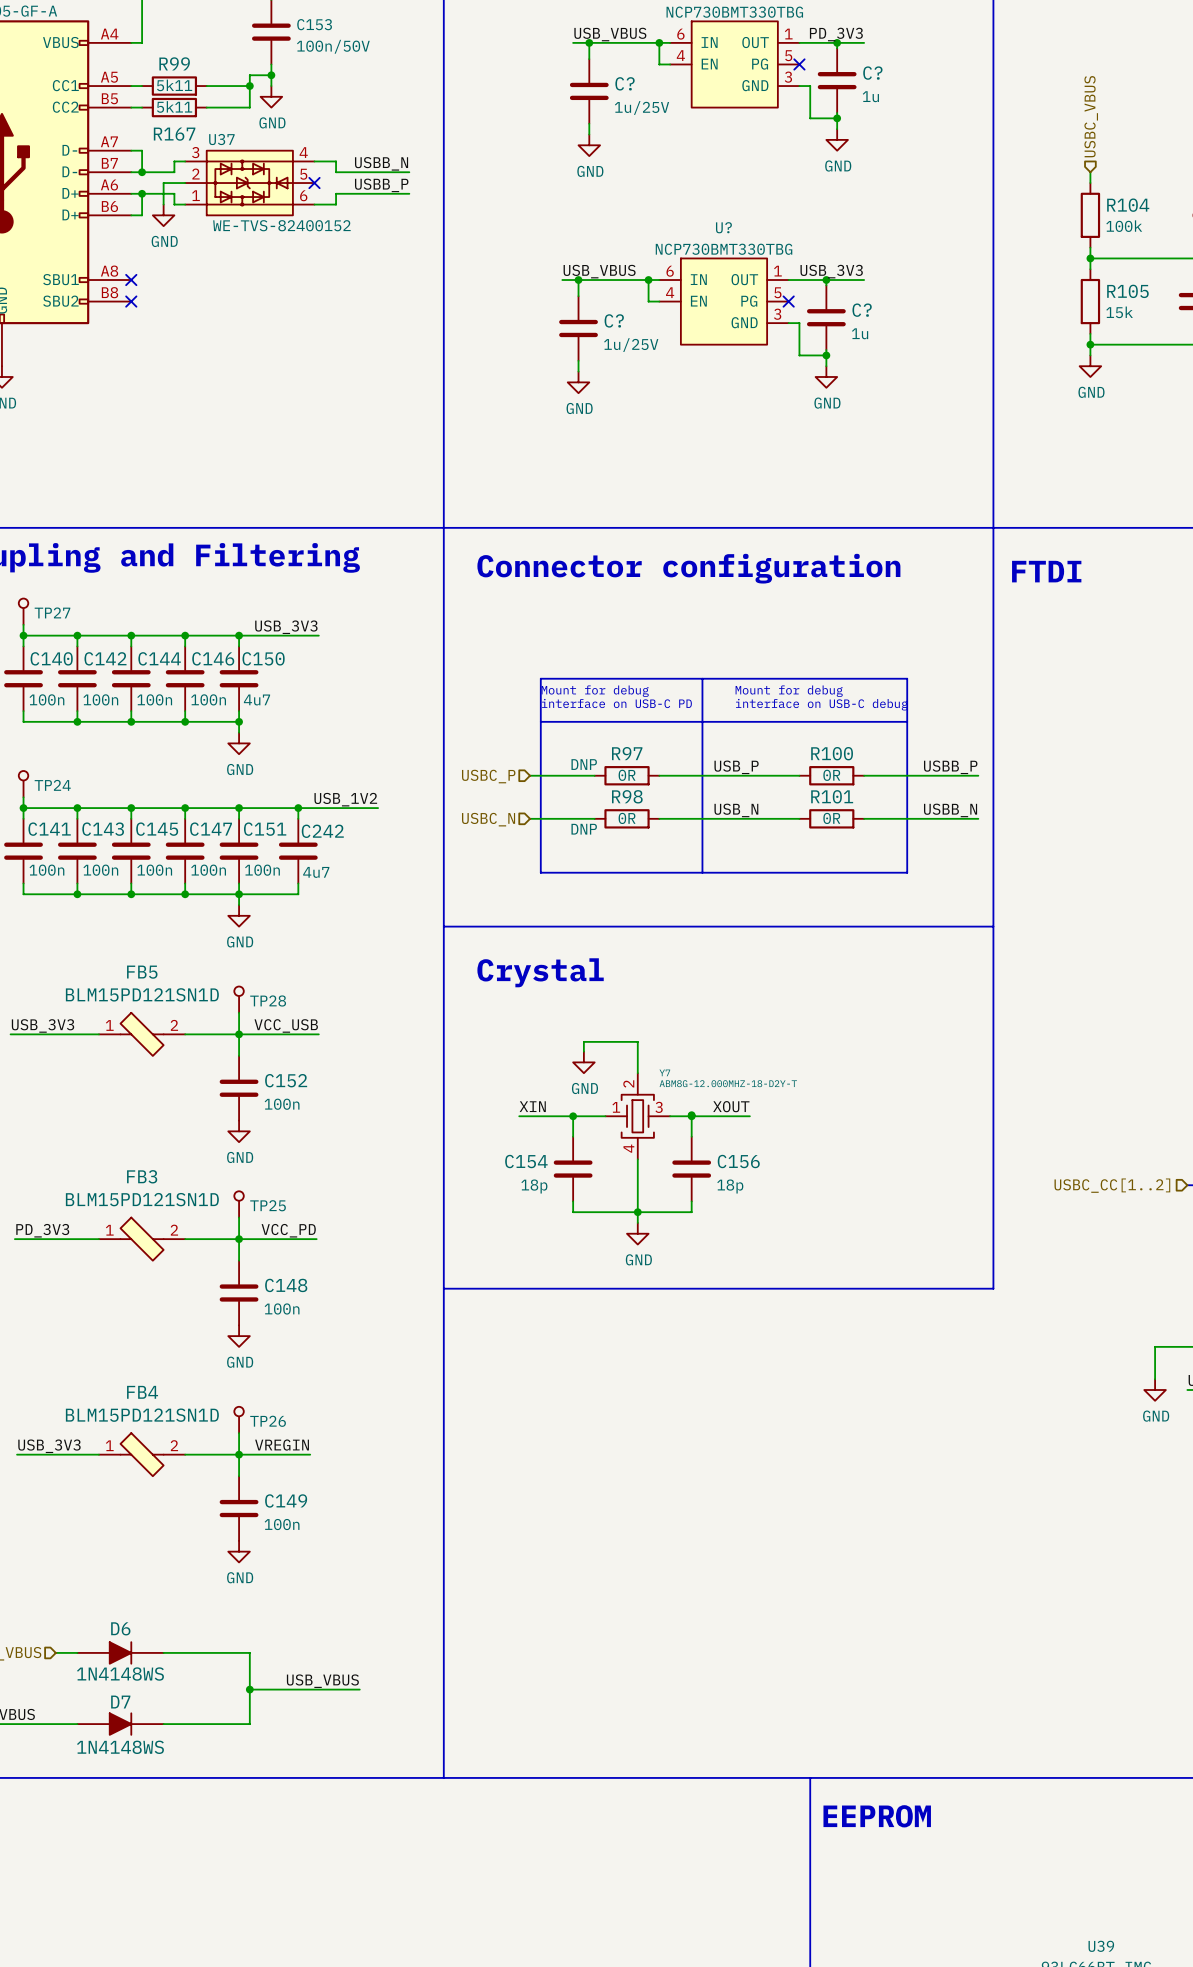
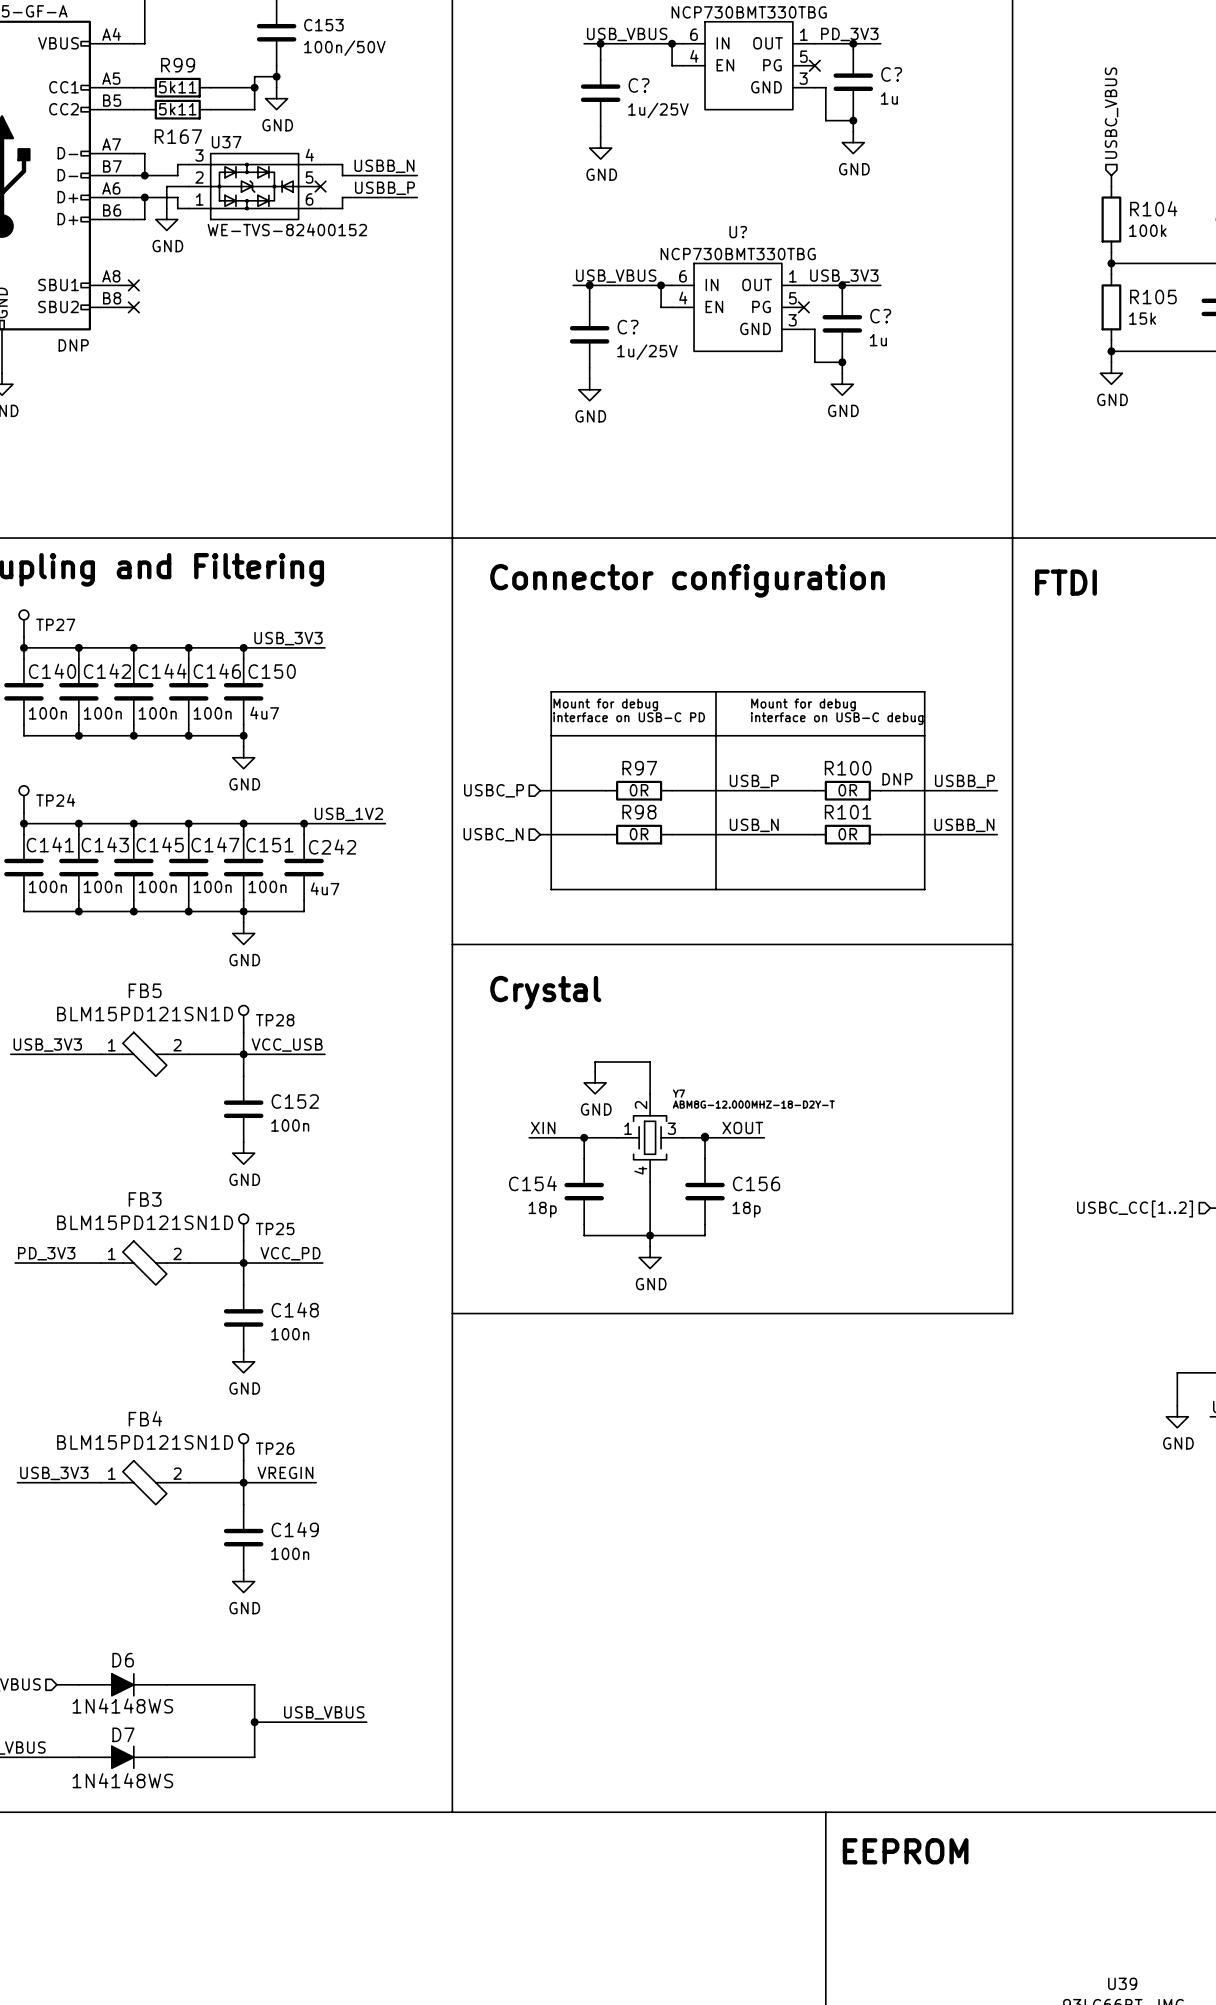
part text: none -> DNP (73, 345)
R97 text: DNP (584, 764) -> none
R100 text: none -> DNP (897, 779)
R98 text: DNP (584, 829) -> none

